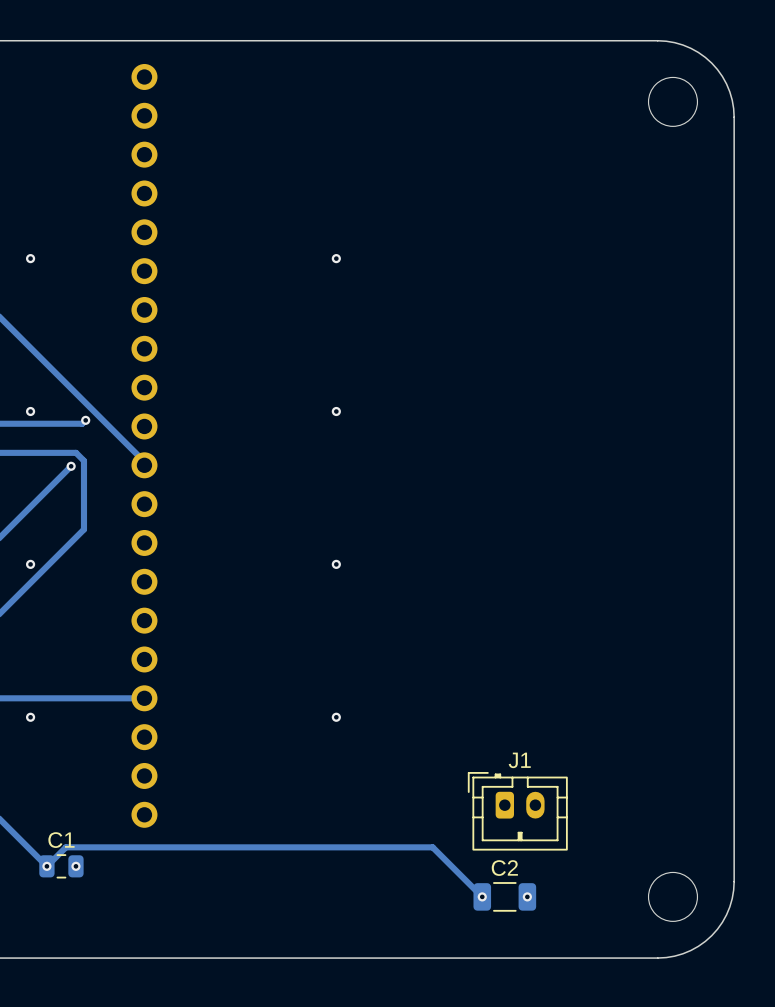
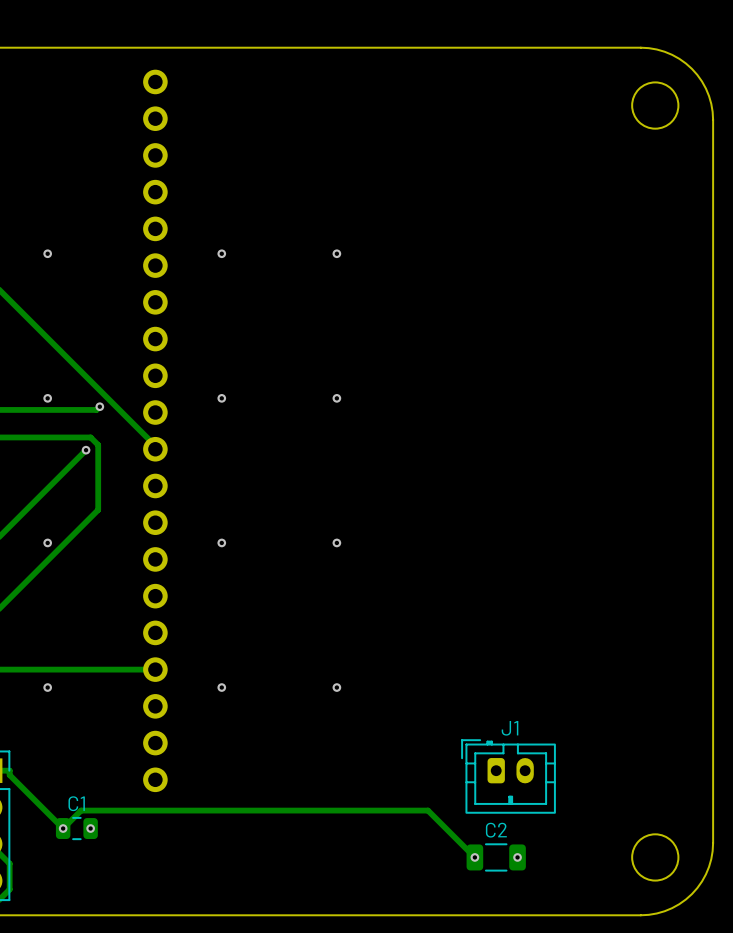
via: none -> (221, 253)
via: none -> (221, 398)
via: none -> (221, 542)
via: none -> (221, 687)

